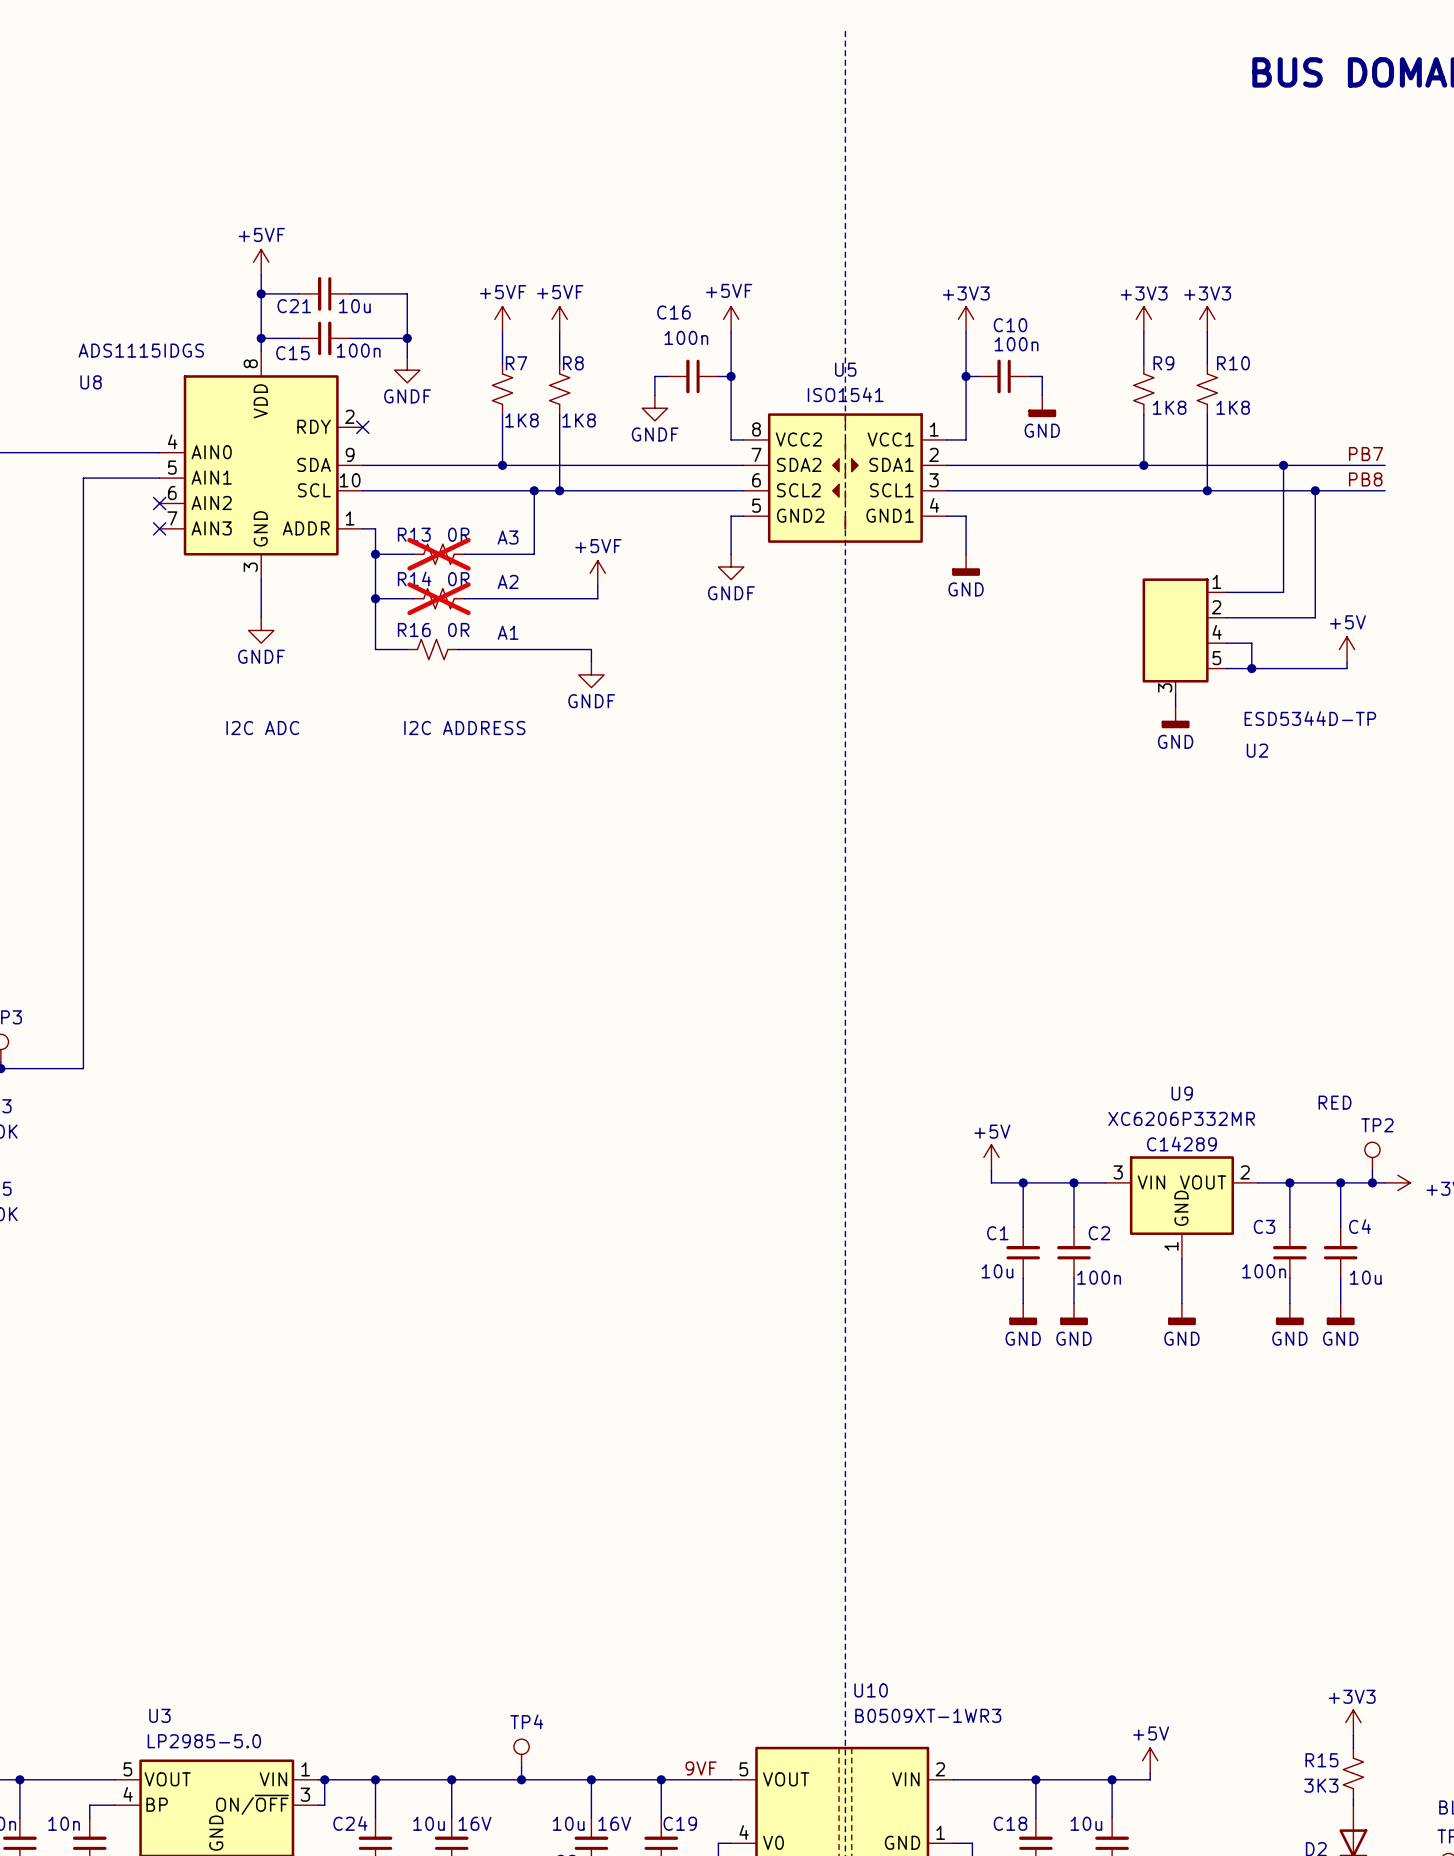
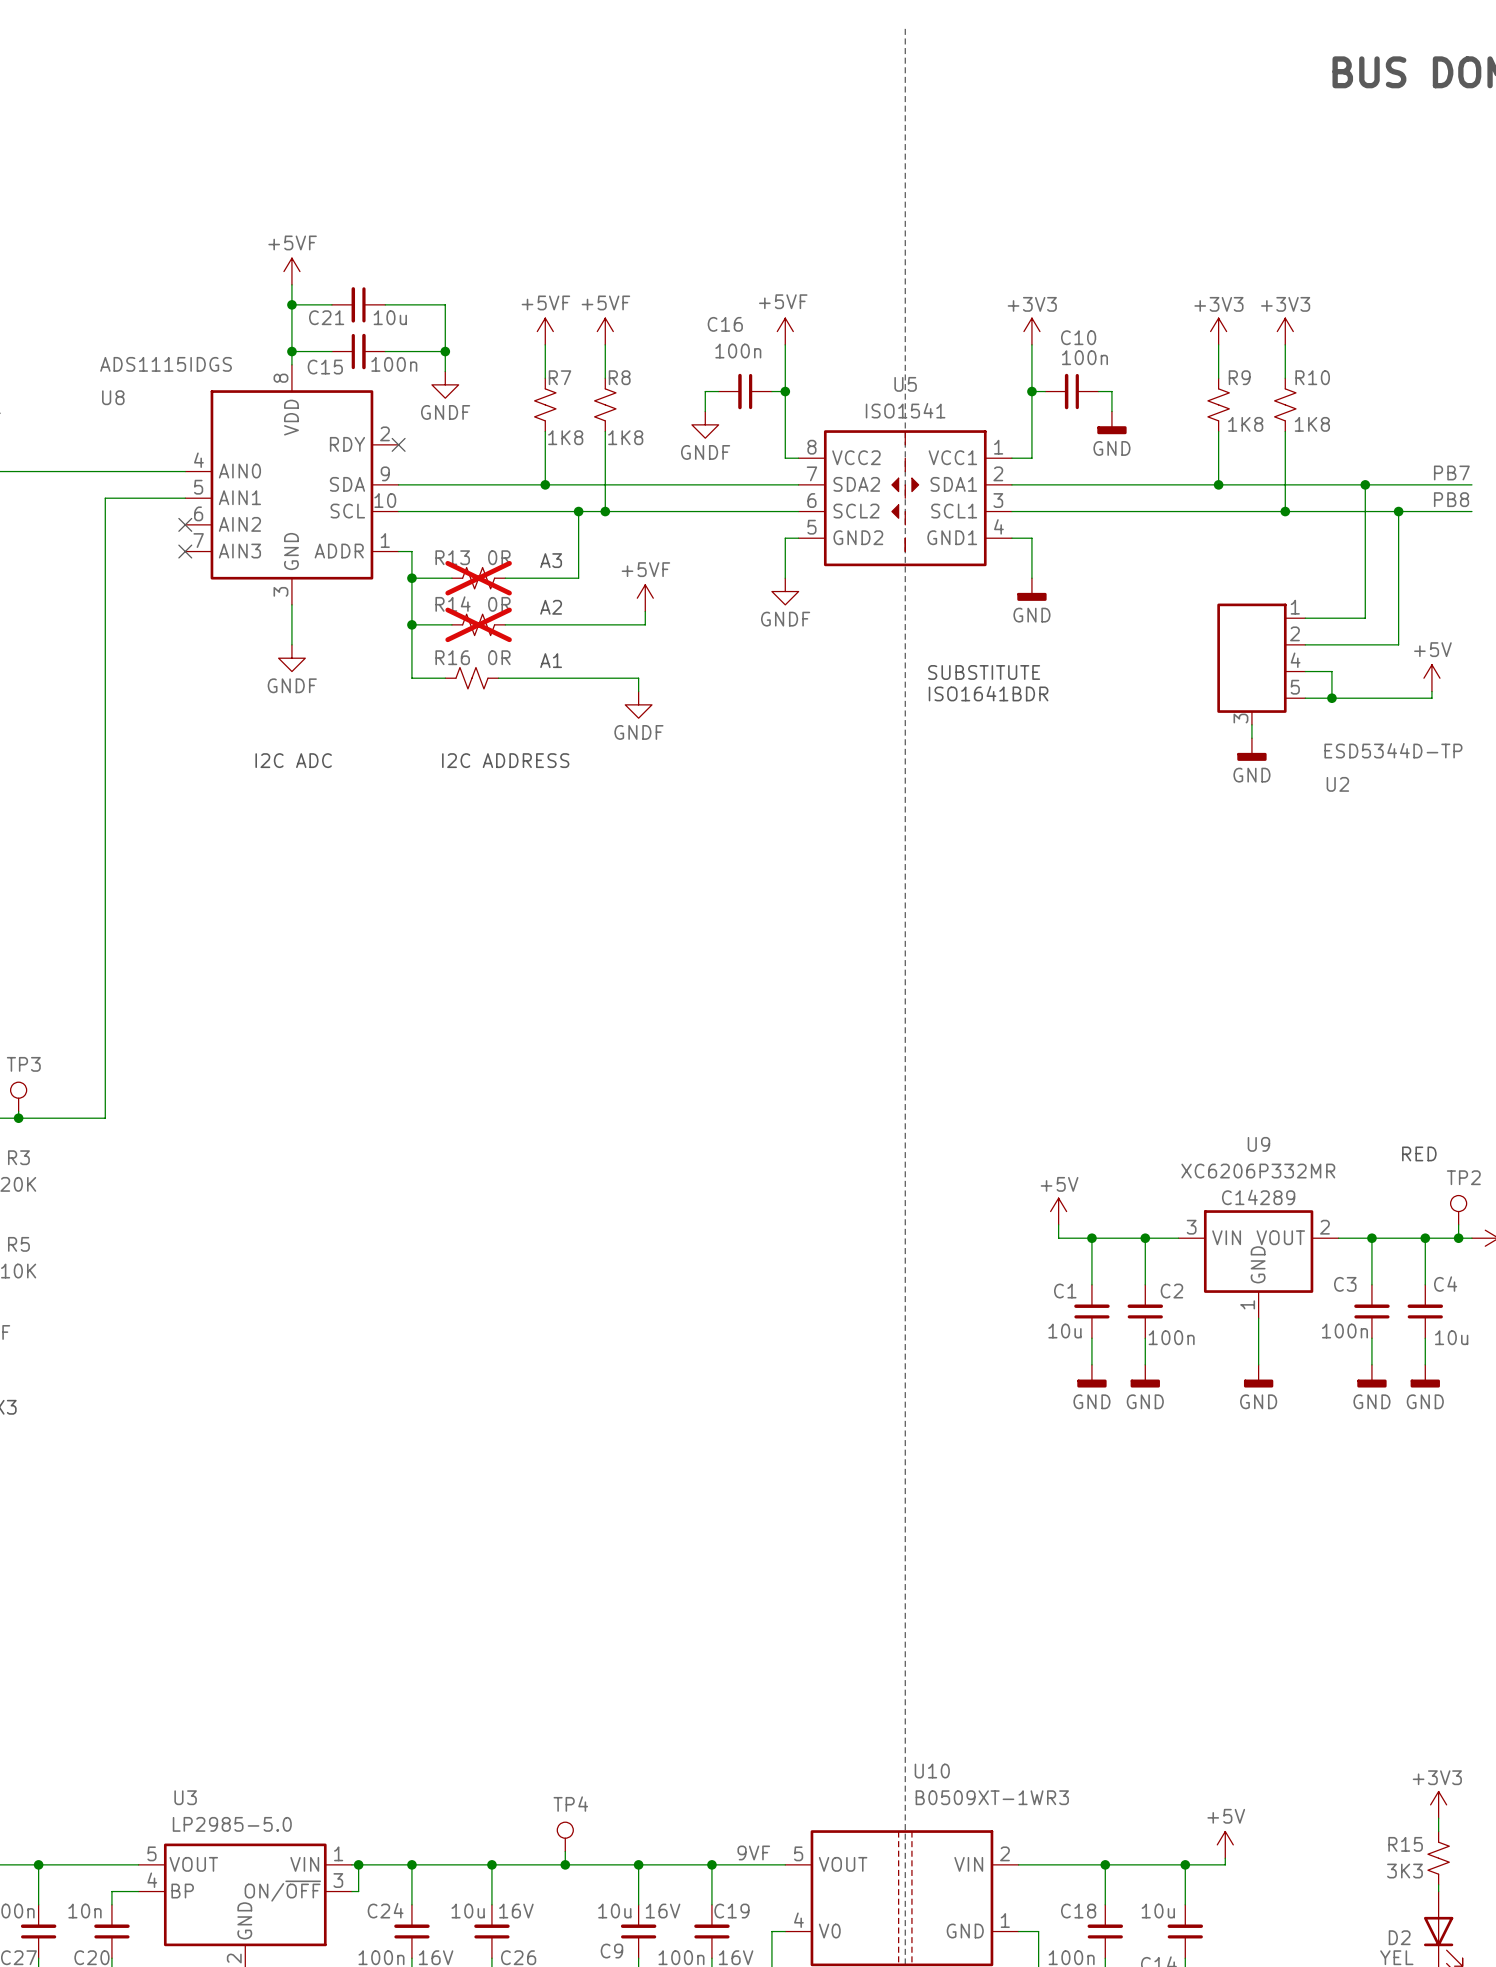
text: none -> SUBSTITUTE (984, 672)
text: none -> ISO1641BDR (988, 693)

